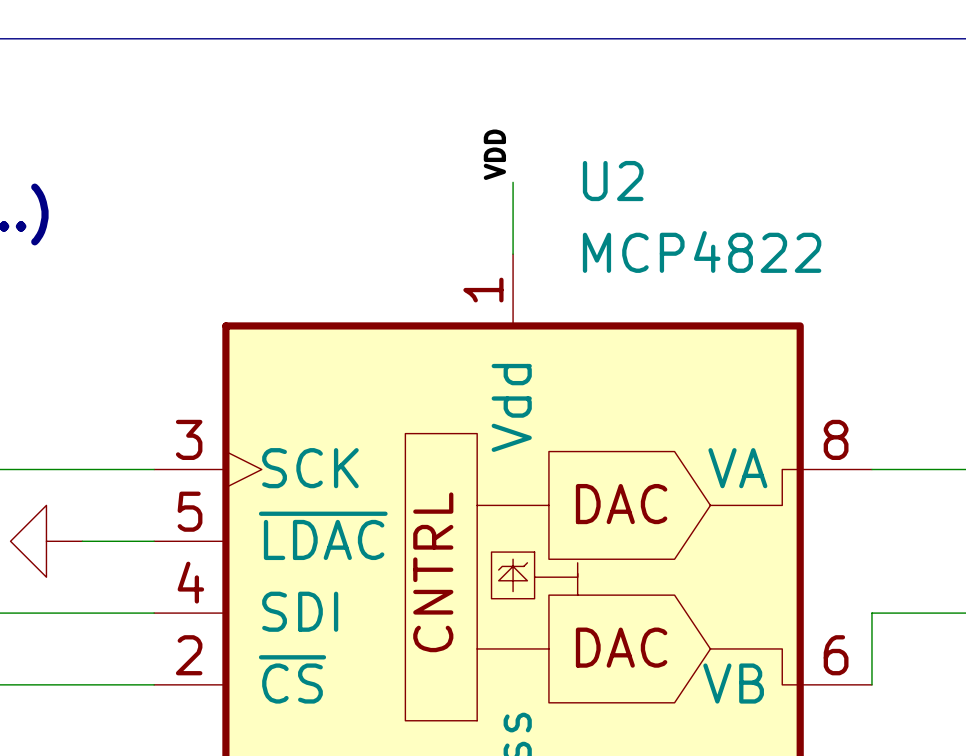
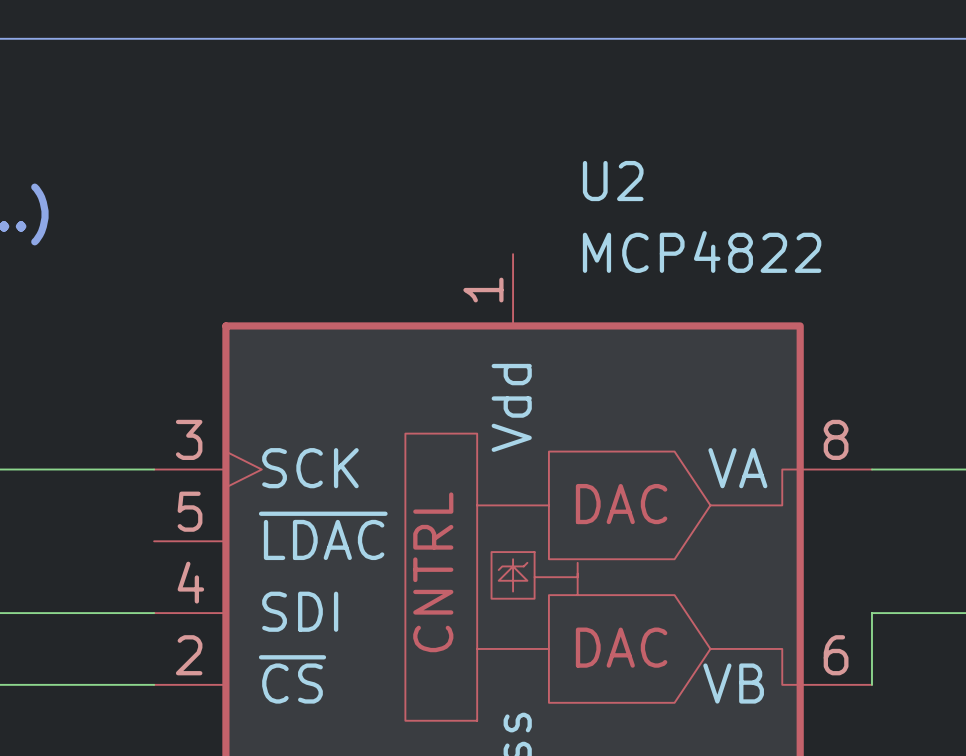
label: VDD (494, 154) -> none
wire: (513, 182) (513, 254) -> none
power symbol: (46, 541) -> none
wire: (82, 541) (154, 541) -> none

